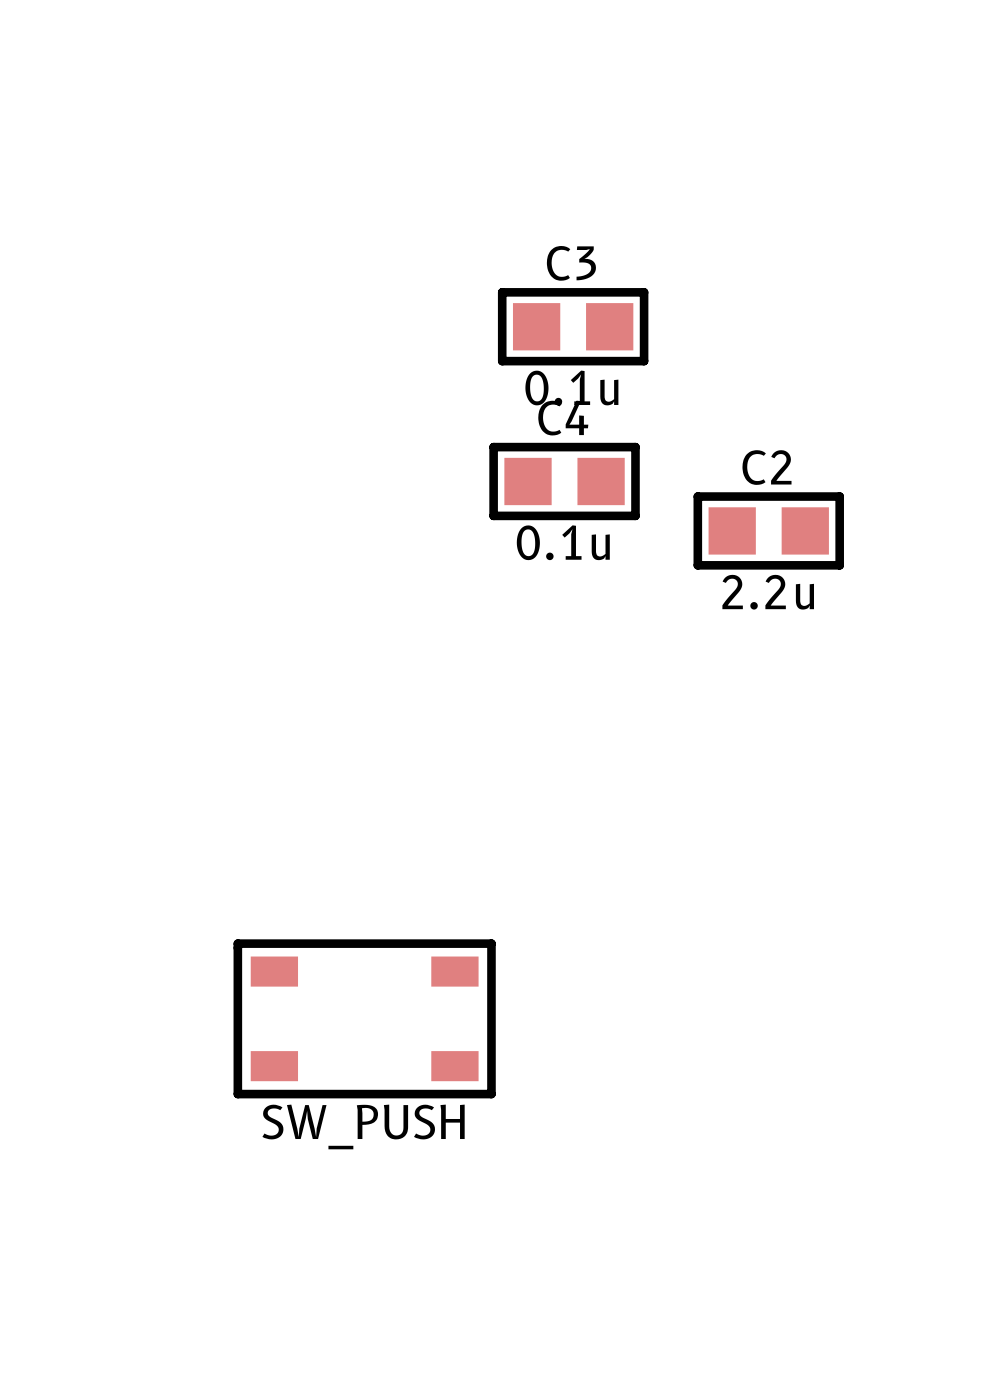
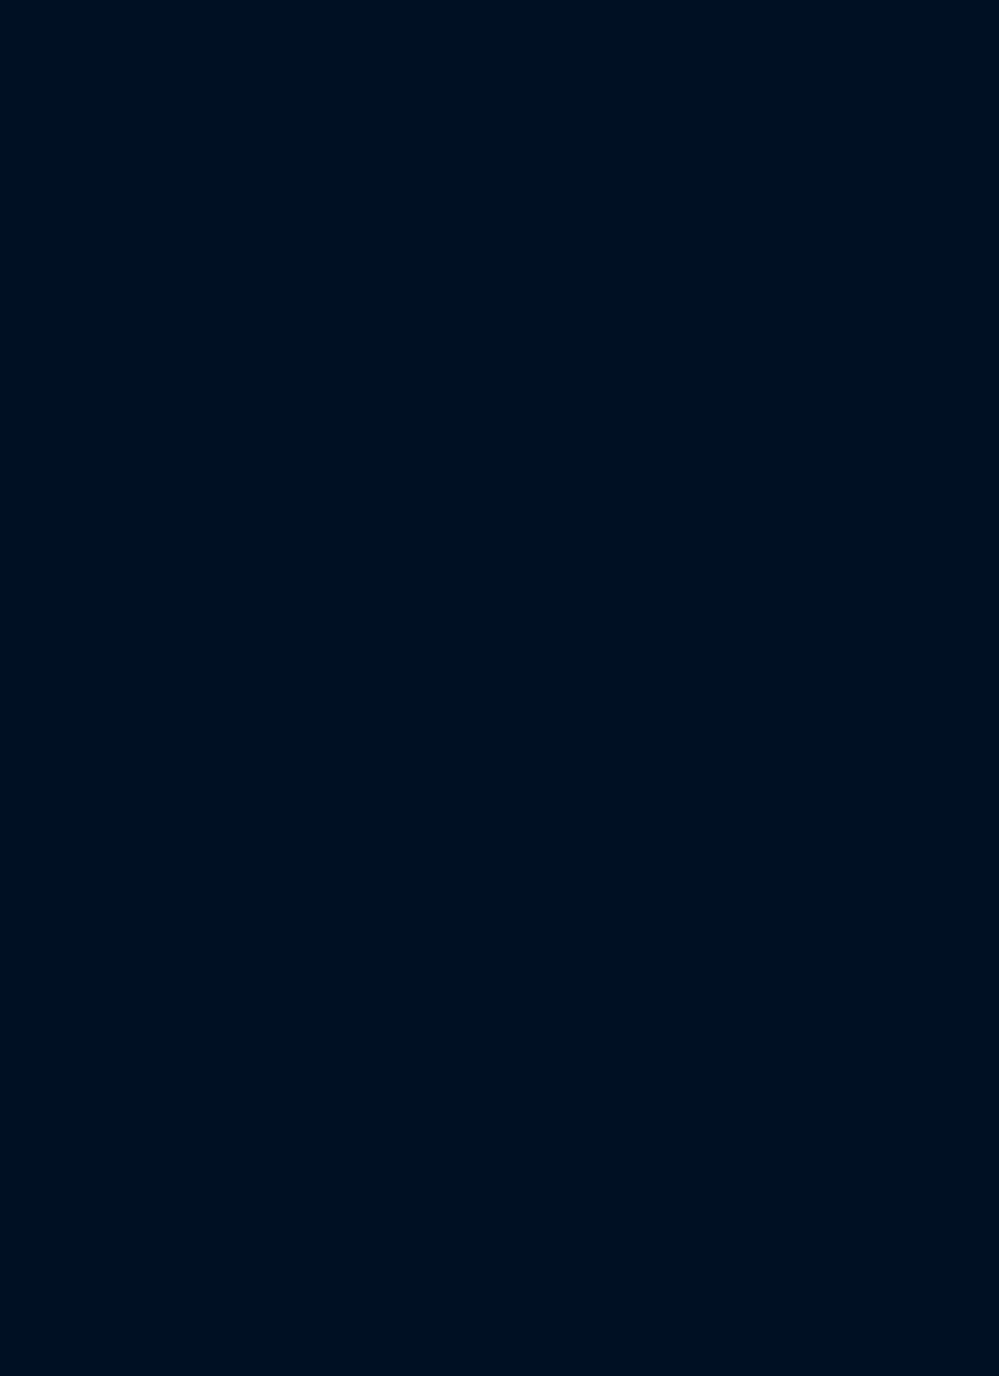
C3: 0.1u (573, 326) -> none
C4: 0.1u (564, 481) -> none
C2: 2.2u (768, 530) -> none
part: SW_PUSH (364, 1018) -> none

